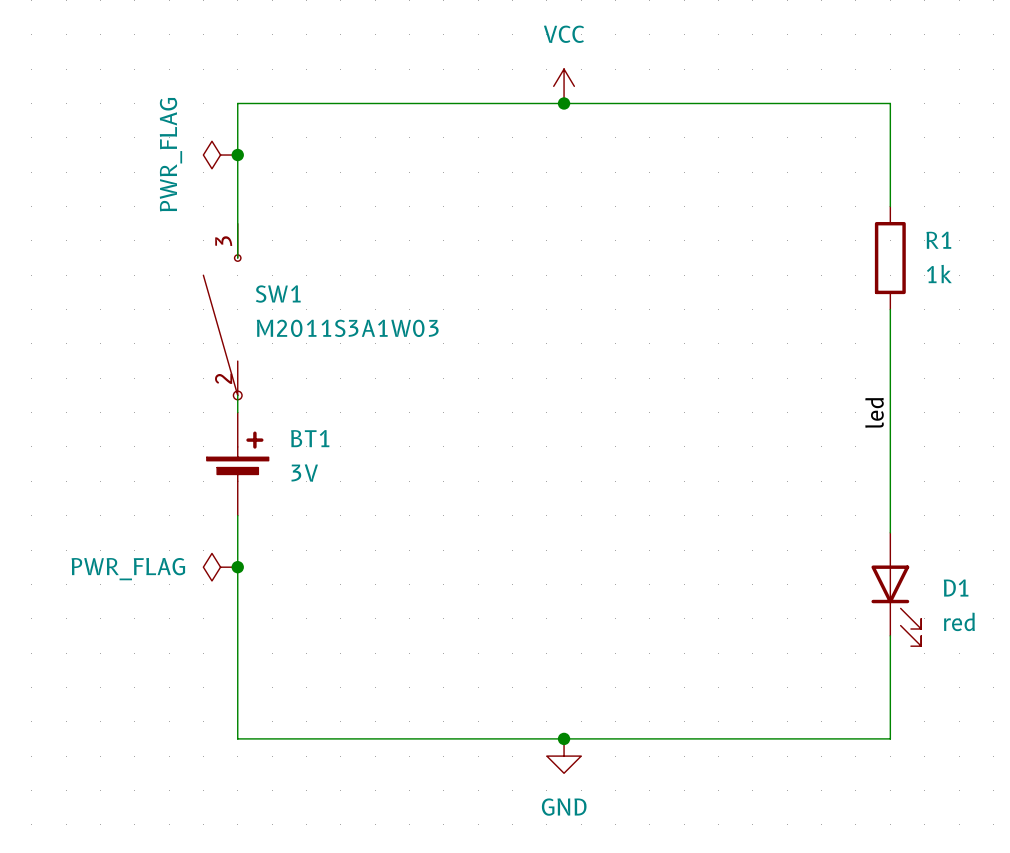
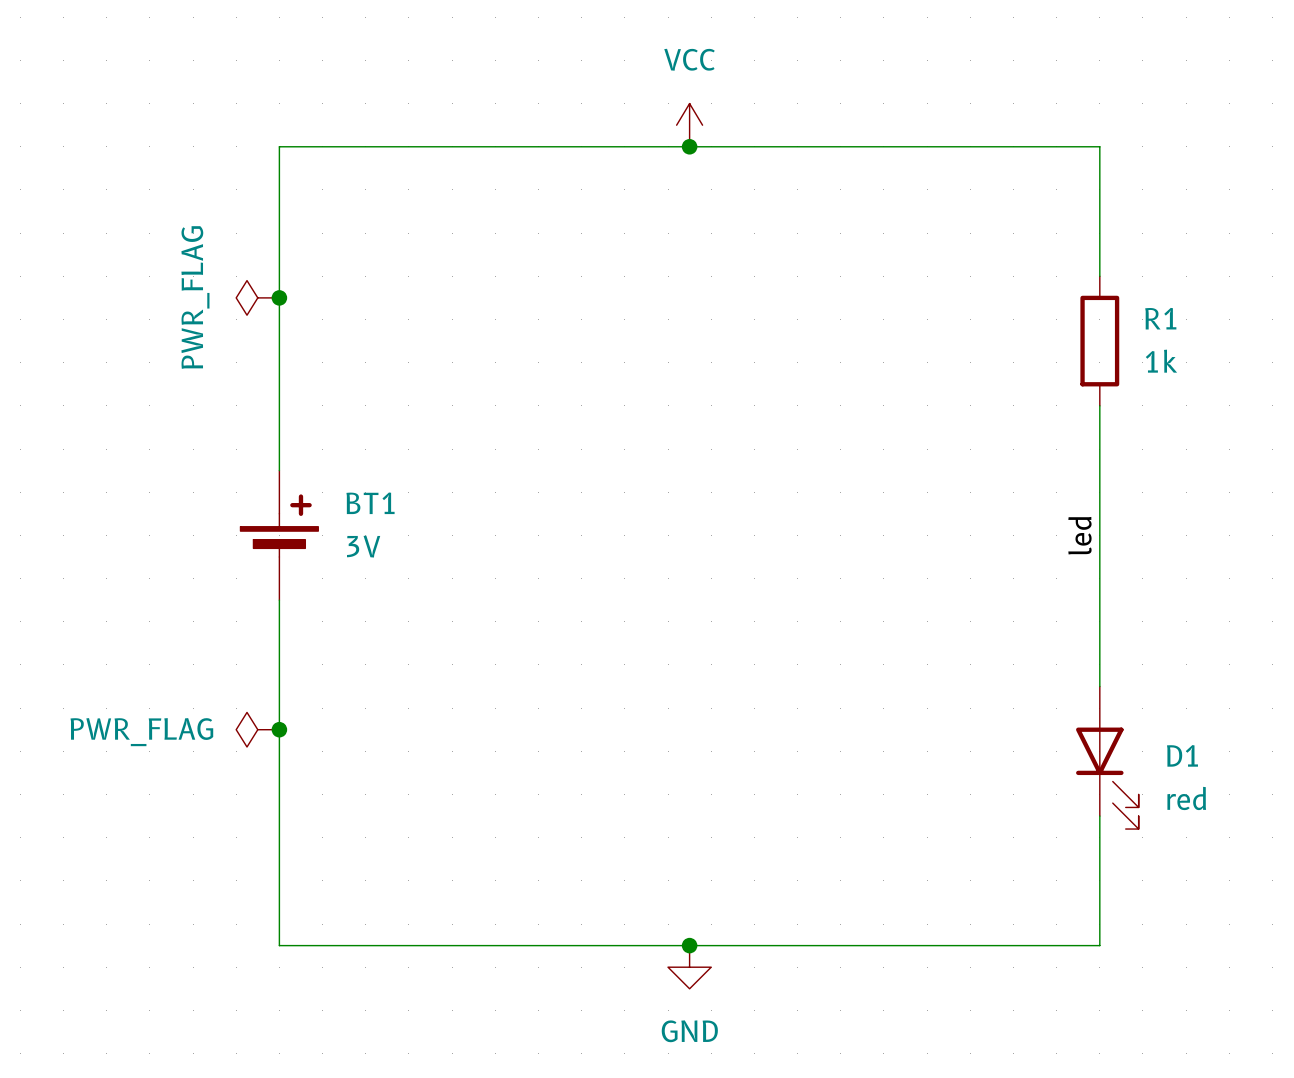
power symbol position: PWR_FLAG (220, 155) -> PWR_FLAG (257, 297)
junction position: (237, 155) -> (279, 297)
wire: none -> (279, 341) (279, 470)
SW1: M2011S3A1W03 (222, 311) -> none
BT1 position: (237, 464) -> (279, 535)

